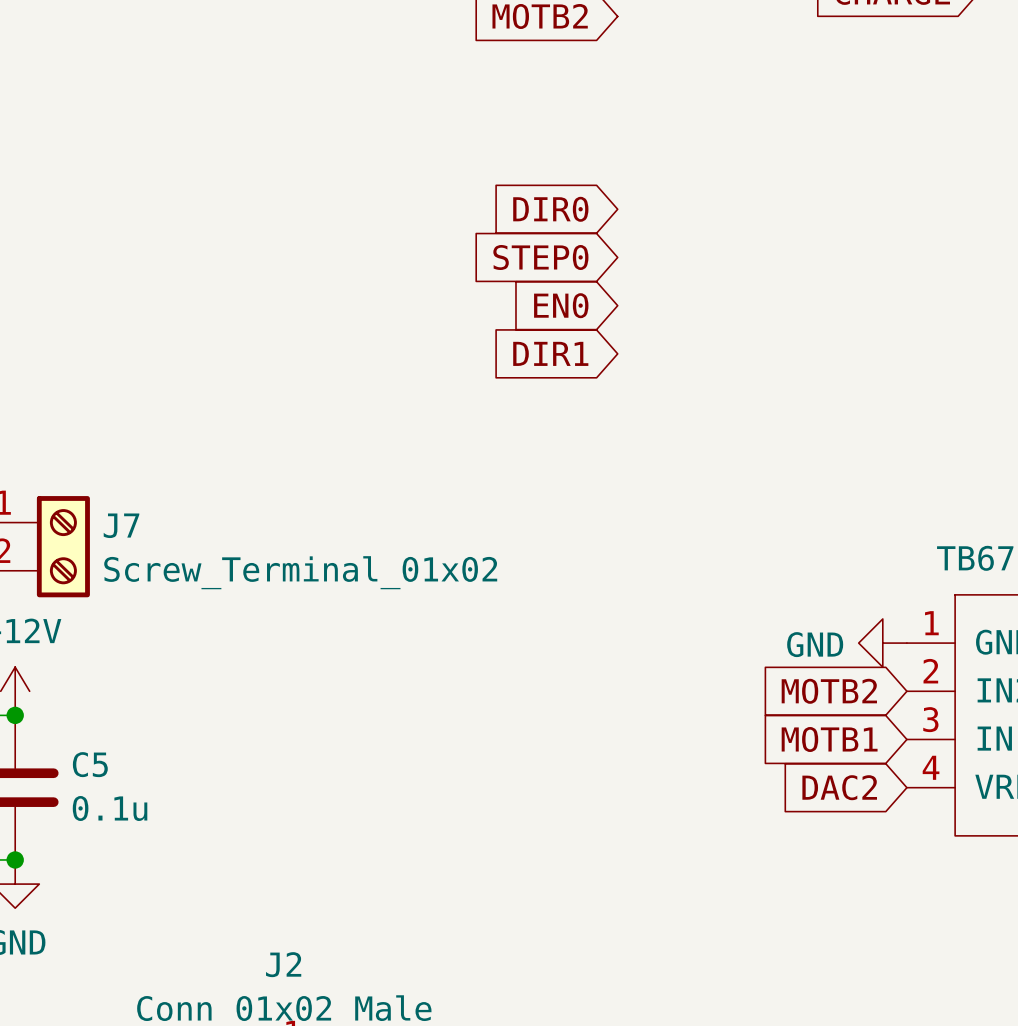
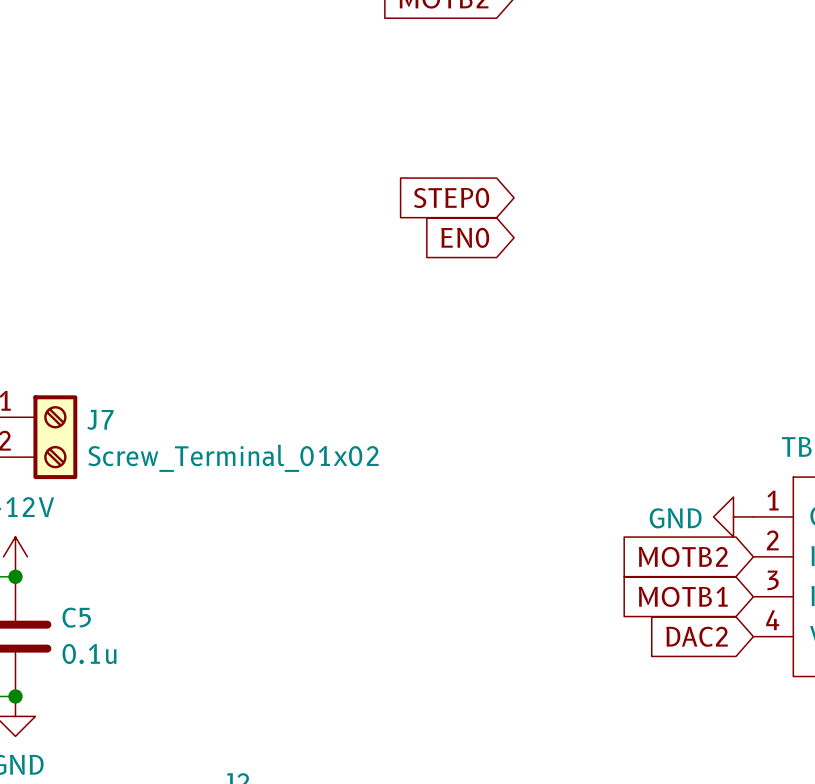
global label: DIR0 (550, 209) -> none
global label: DIR1 (550, 353) -> none

